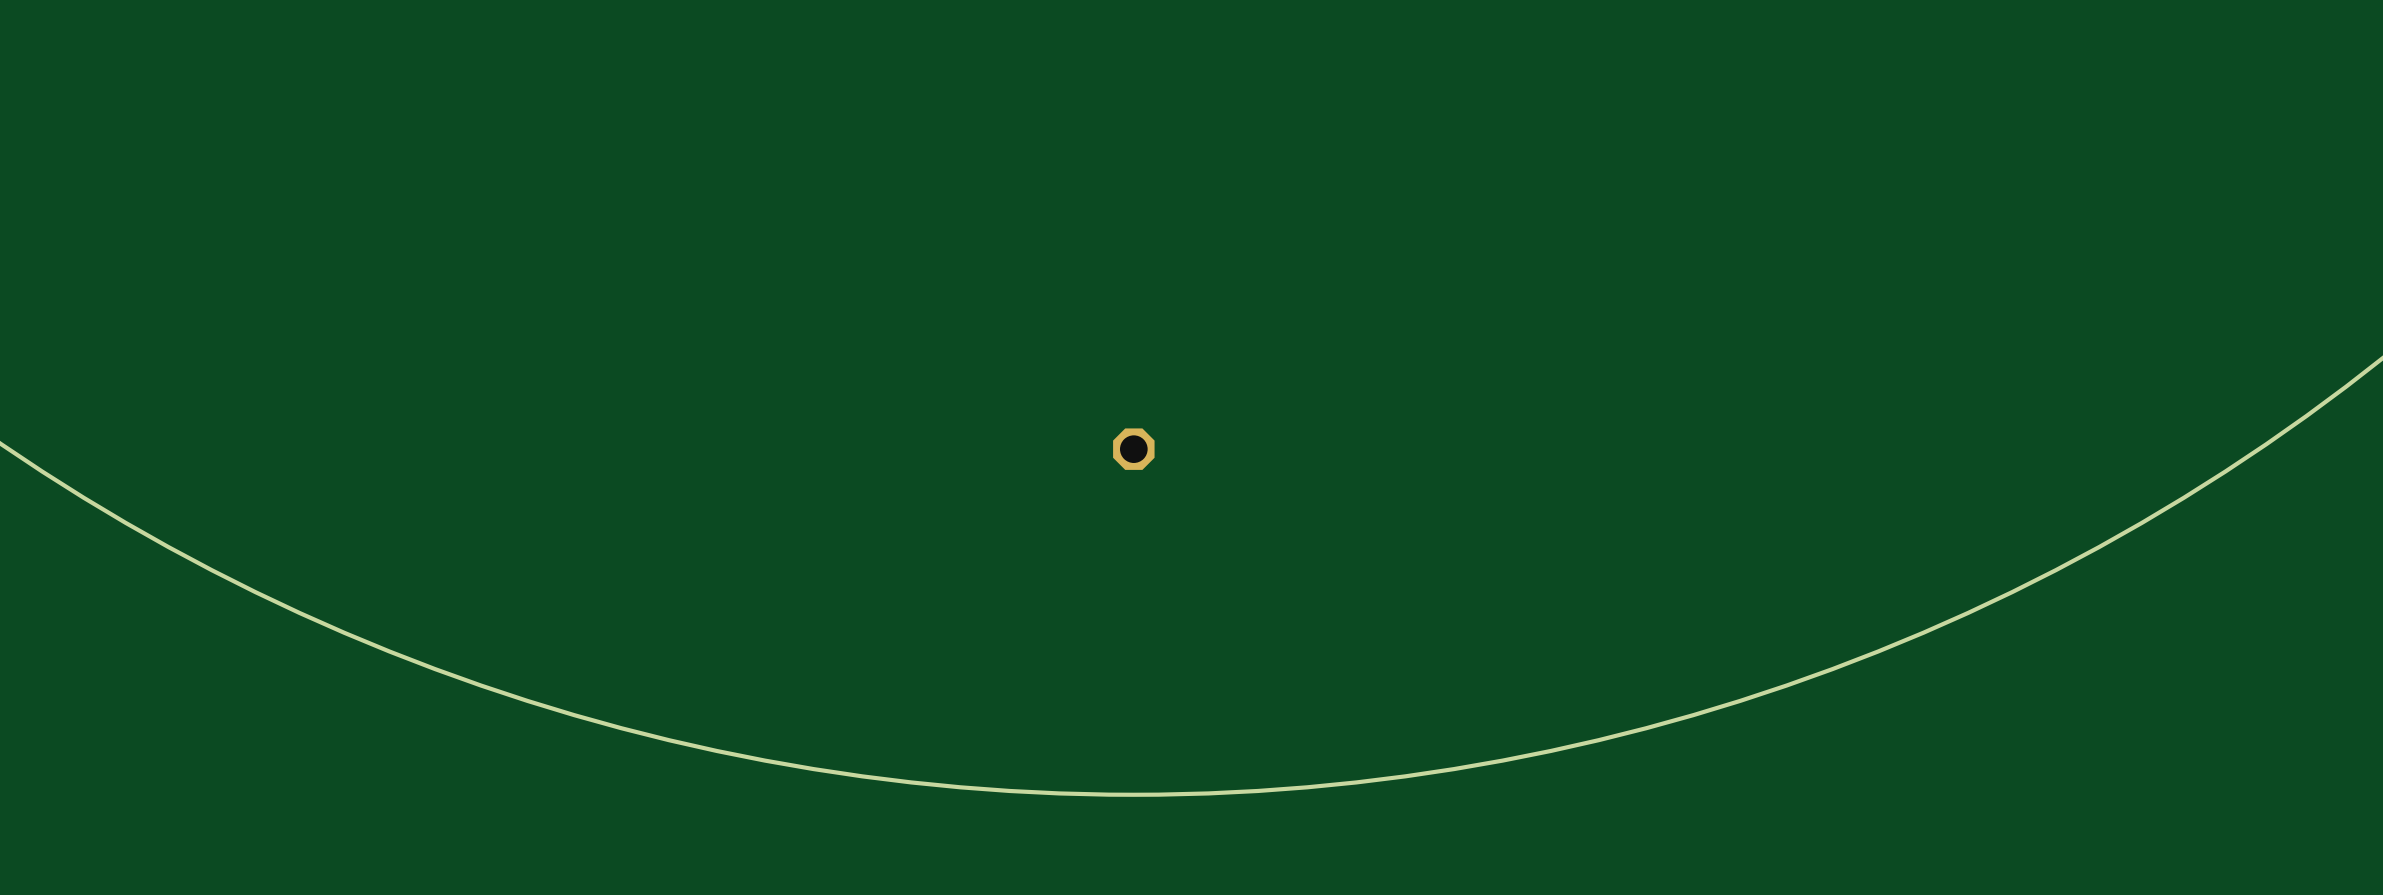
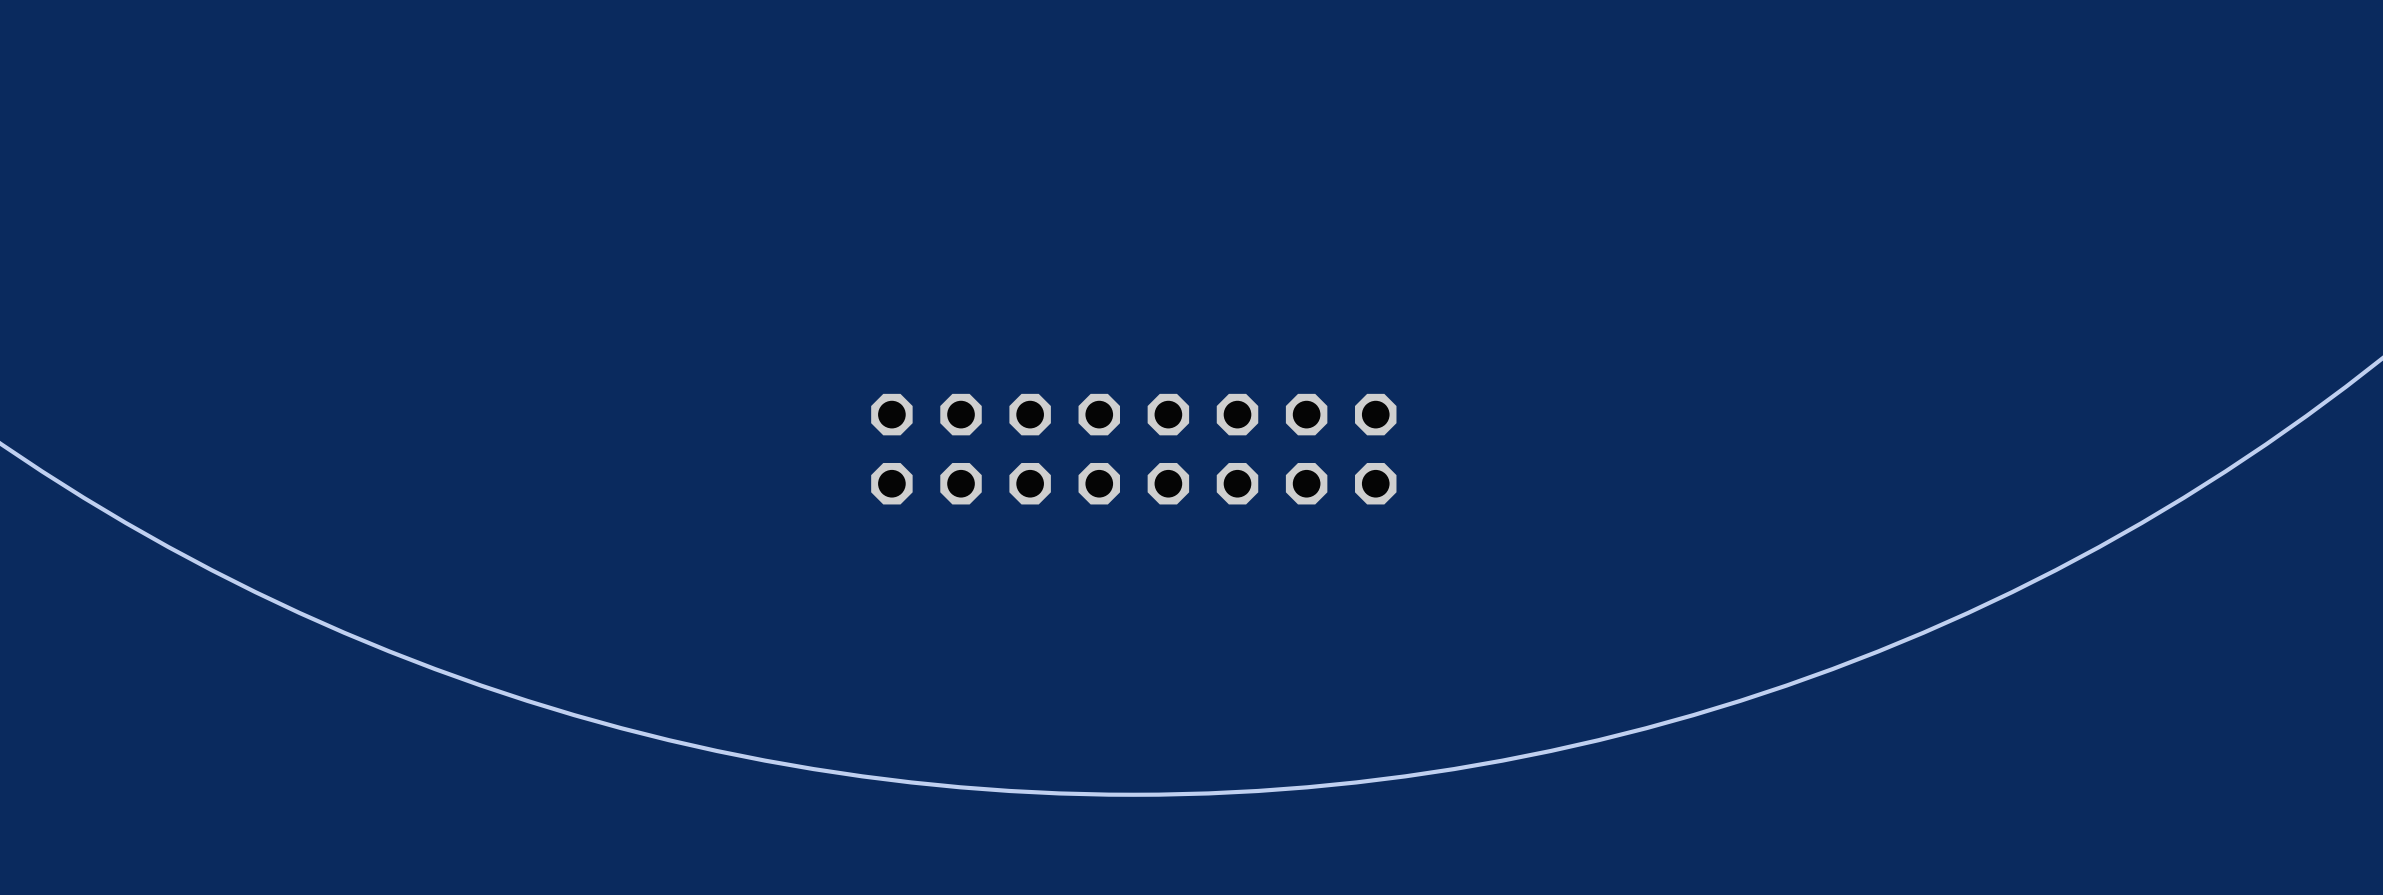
part footprint: [1113, 428, 1155, 470] -> [871, 393, 1397, 505]

